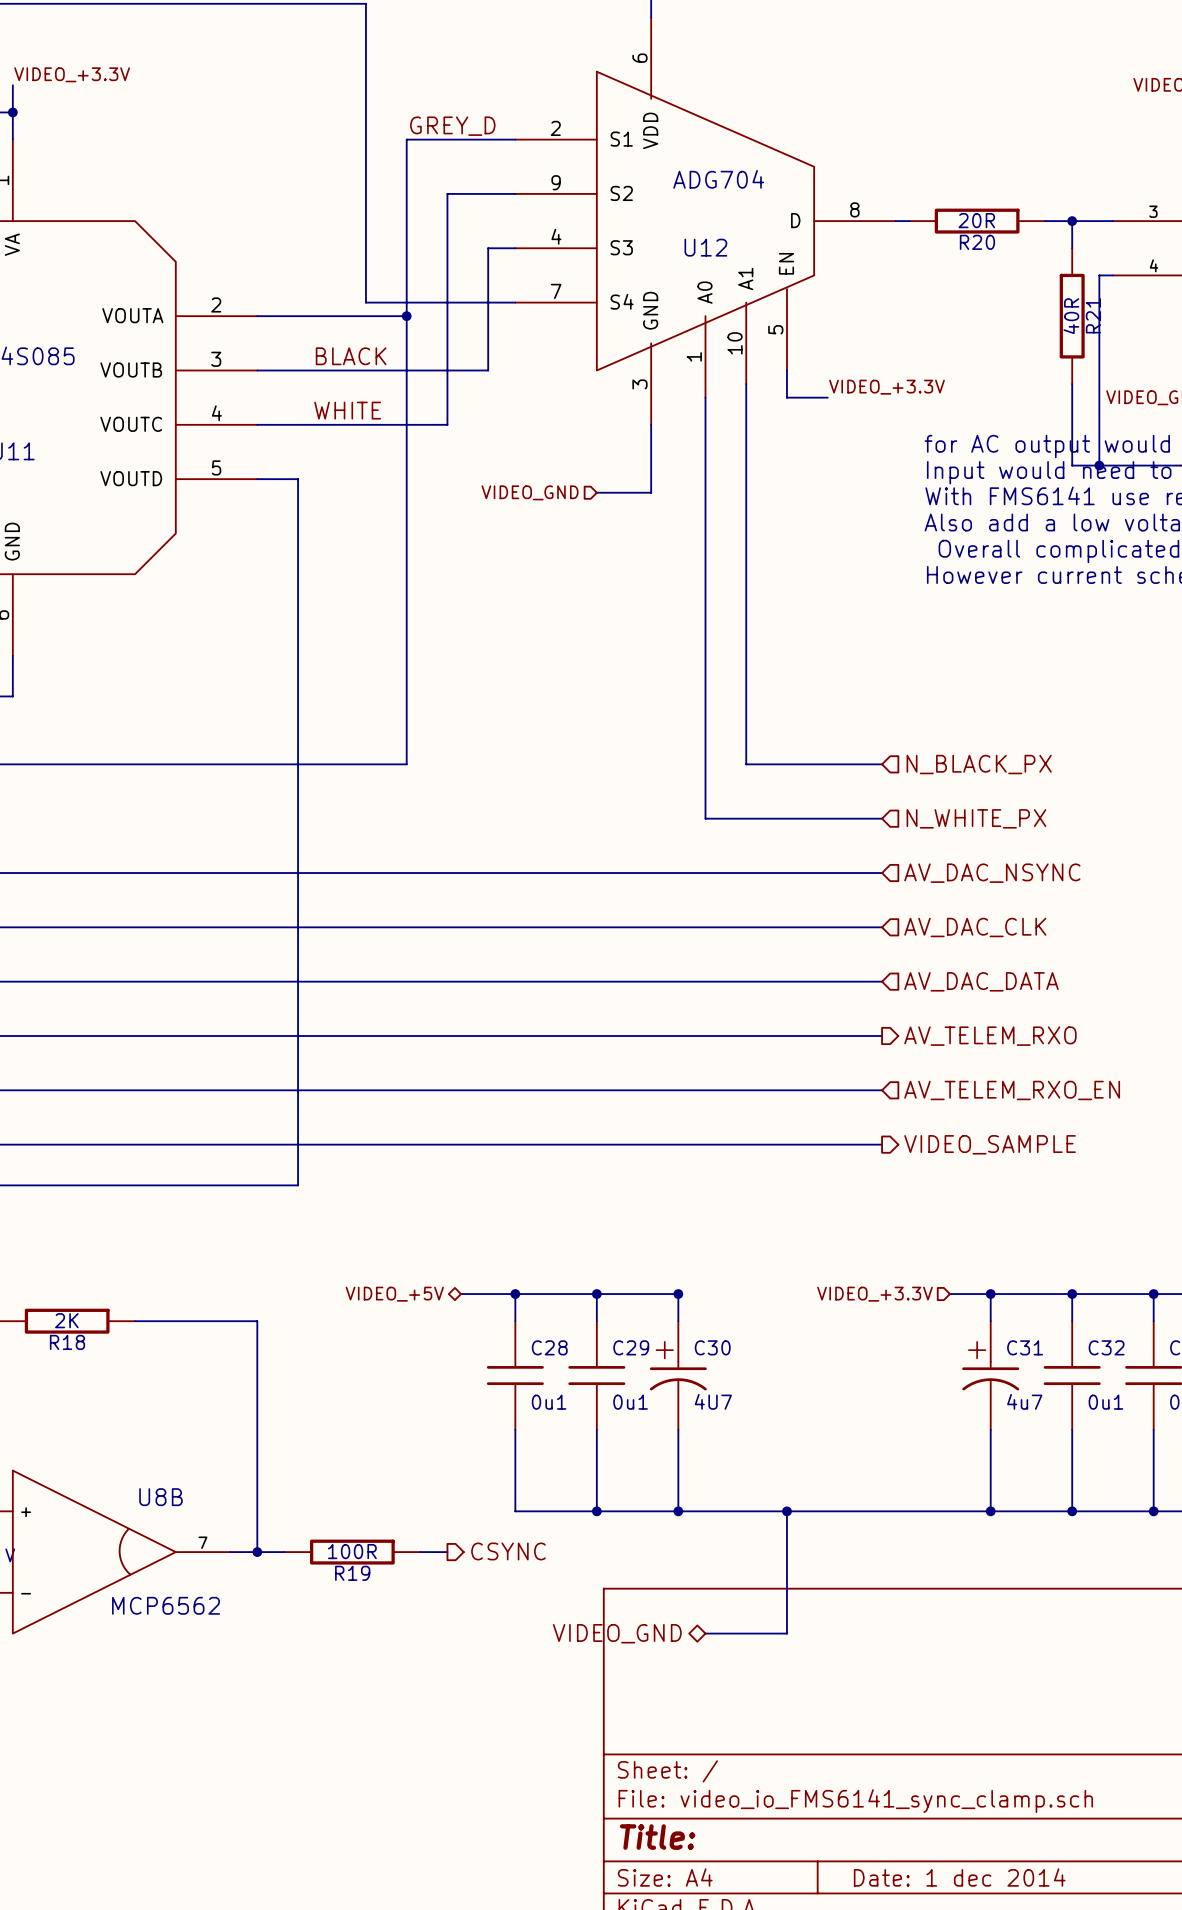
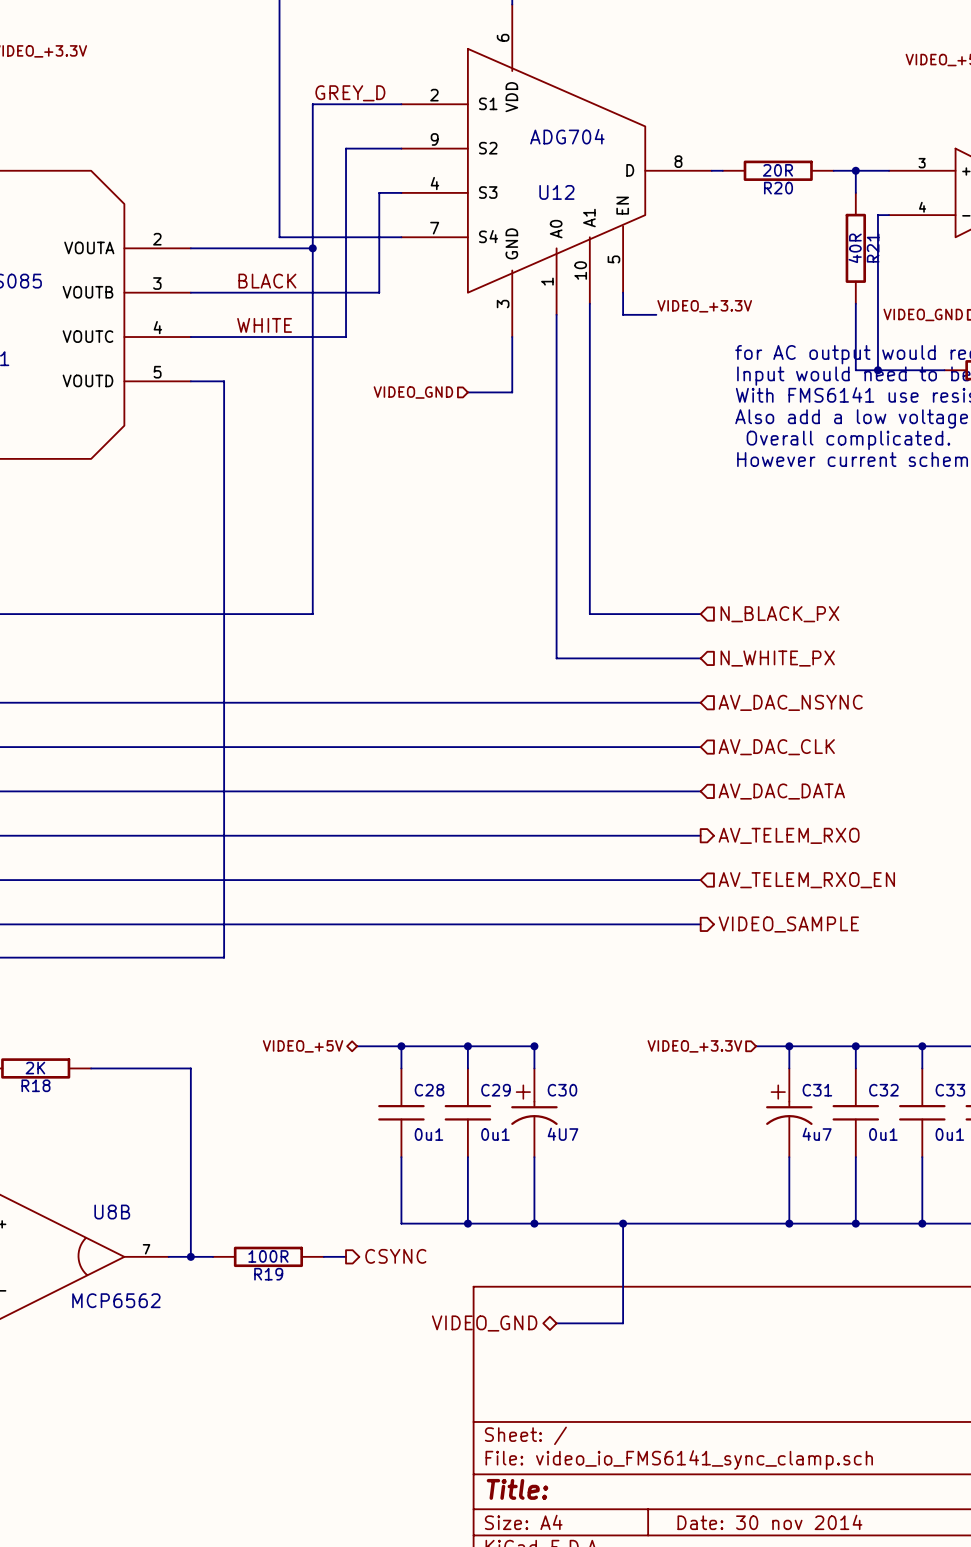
title block: Date: 1 dec 2014 (959, 1877) -> Date: 30 nov 2014 (769, 1522)

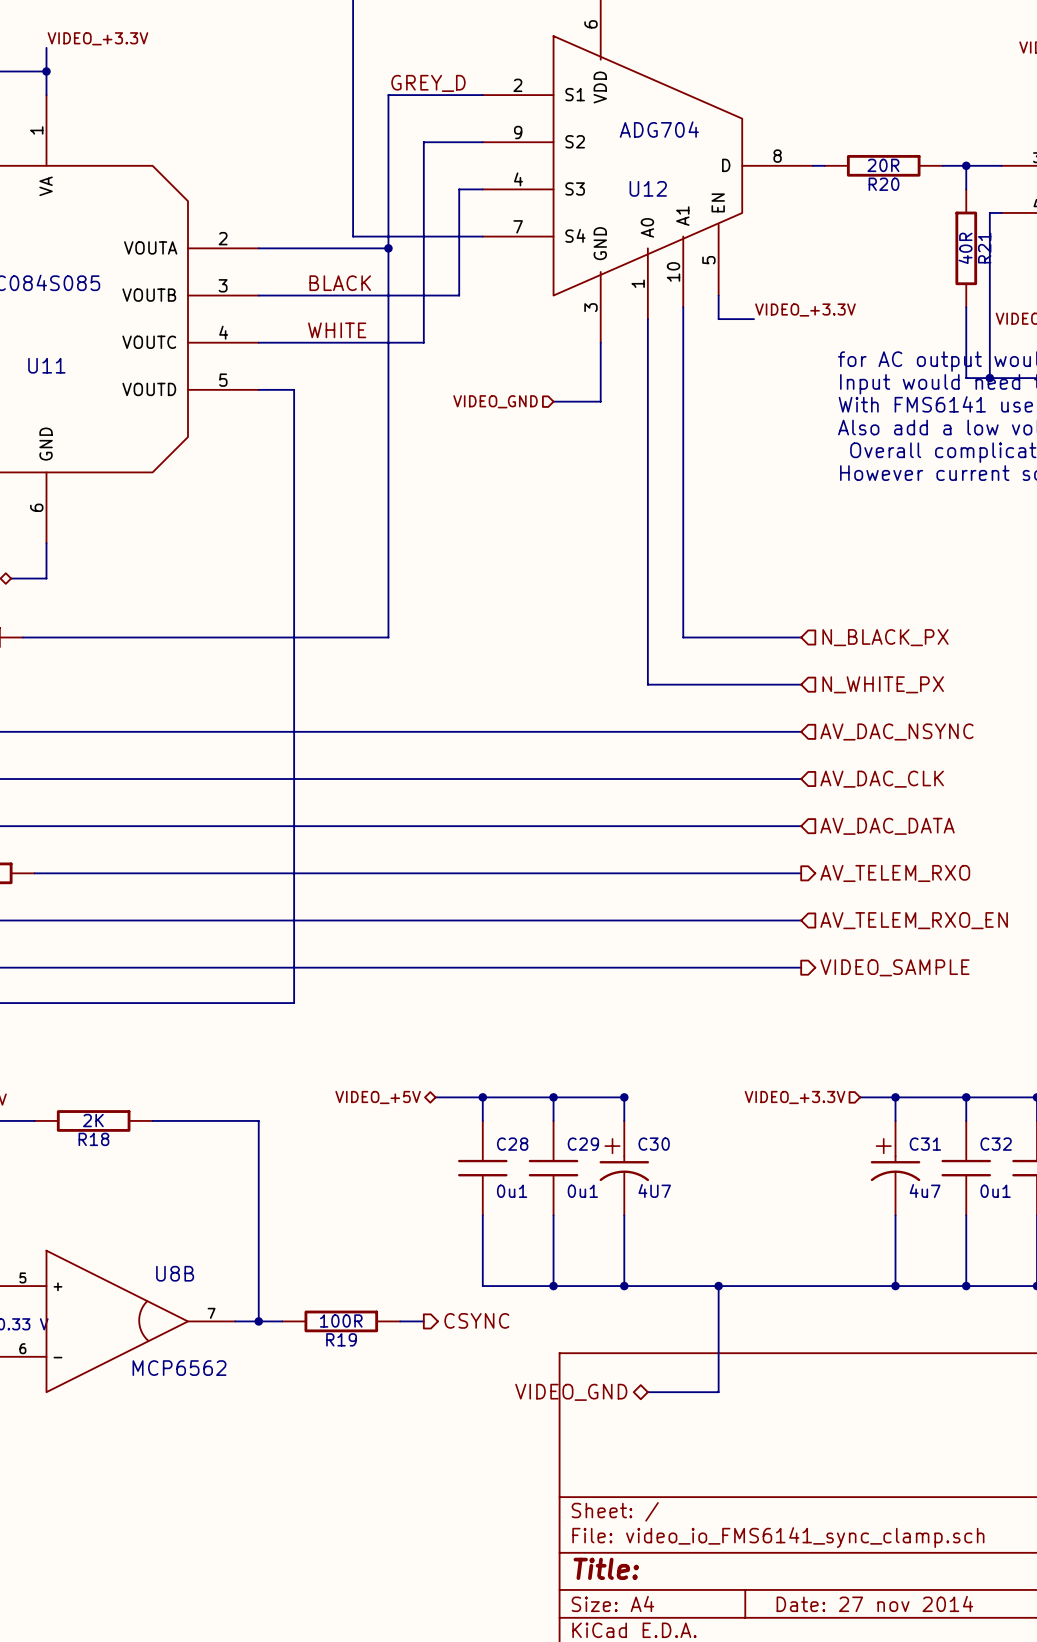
title block: Date: 30 nov 2014 (769, 1522) -> Date: 27 nov 2014 (874, 1603)

